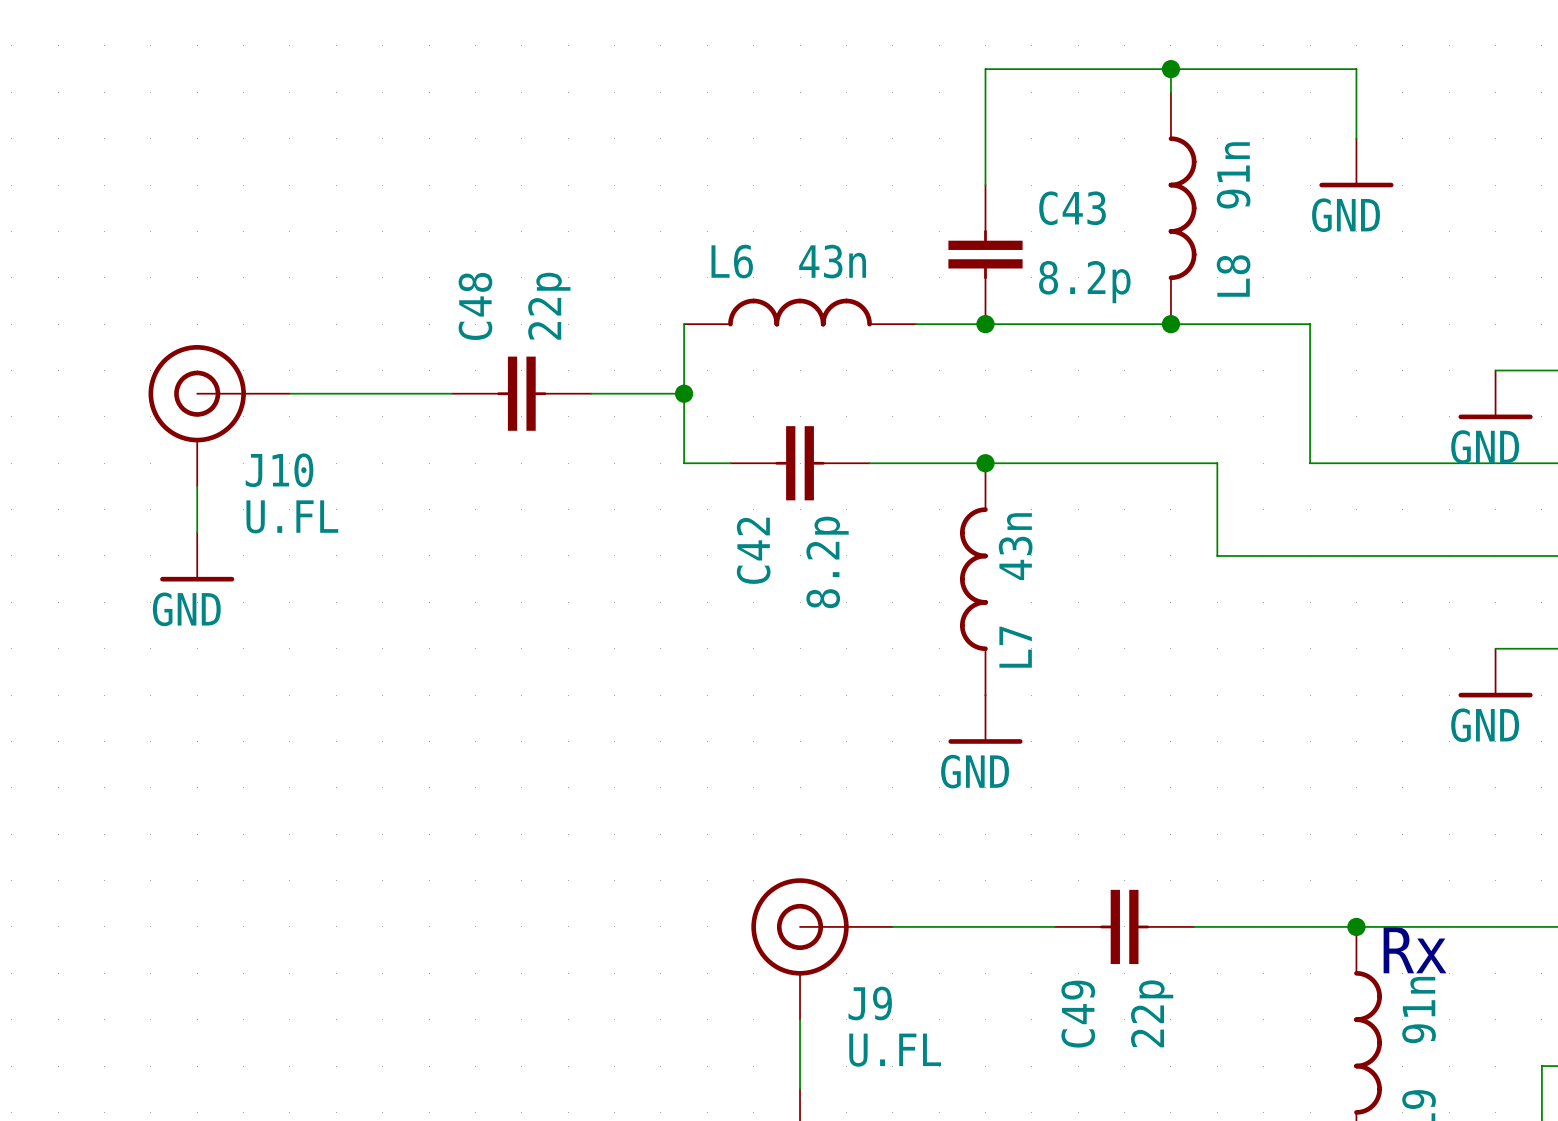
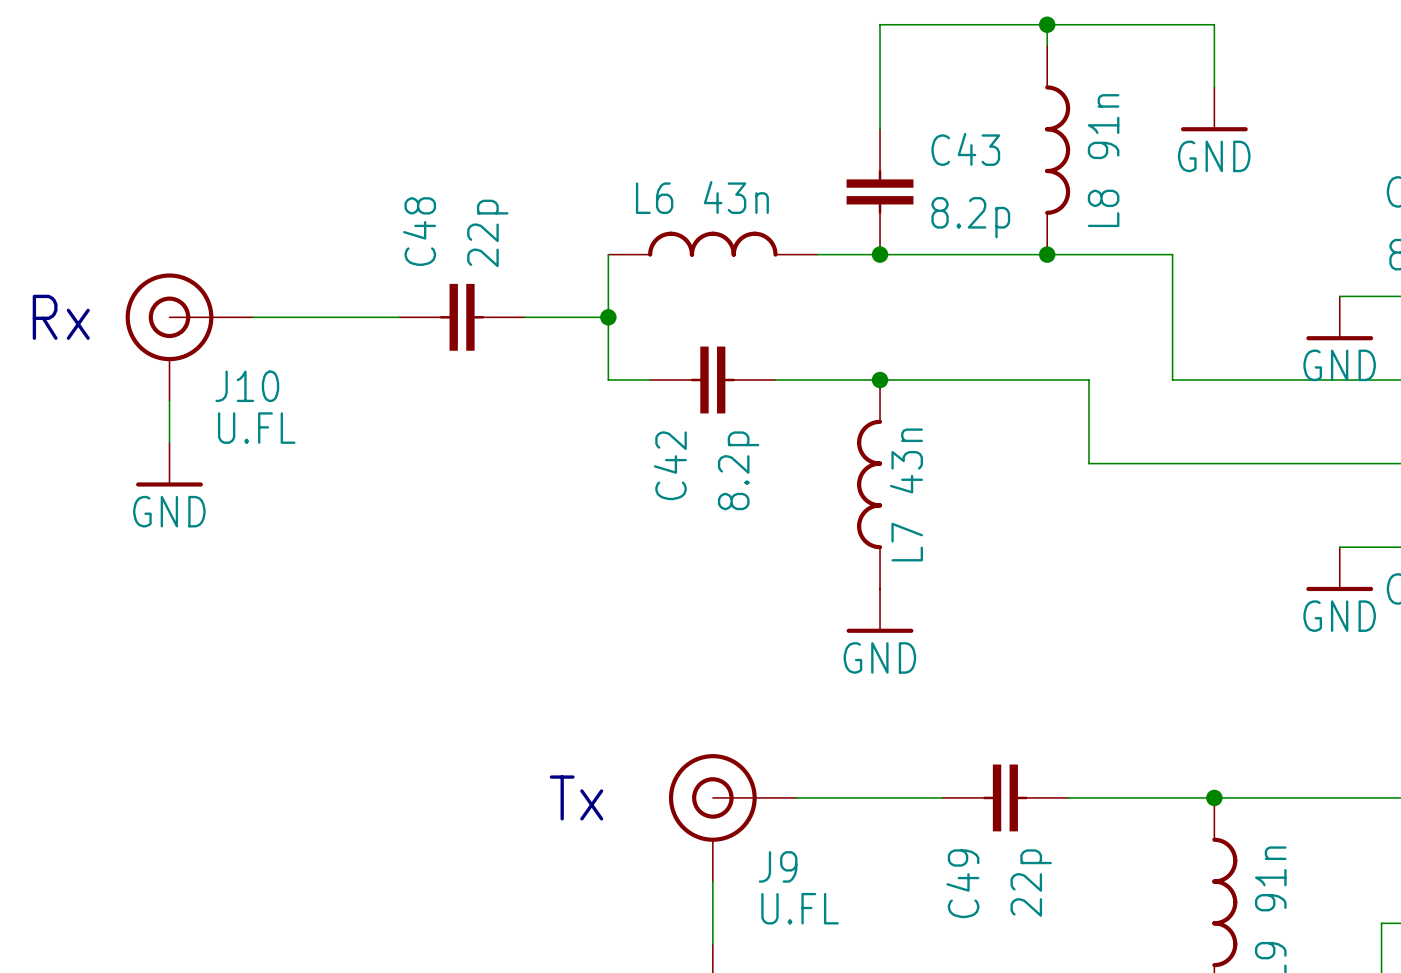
text: none -> Rx (61, 317)
text: none -> Tx (576, 797)
text: Rx (1415, 950) -> none

